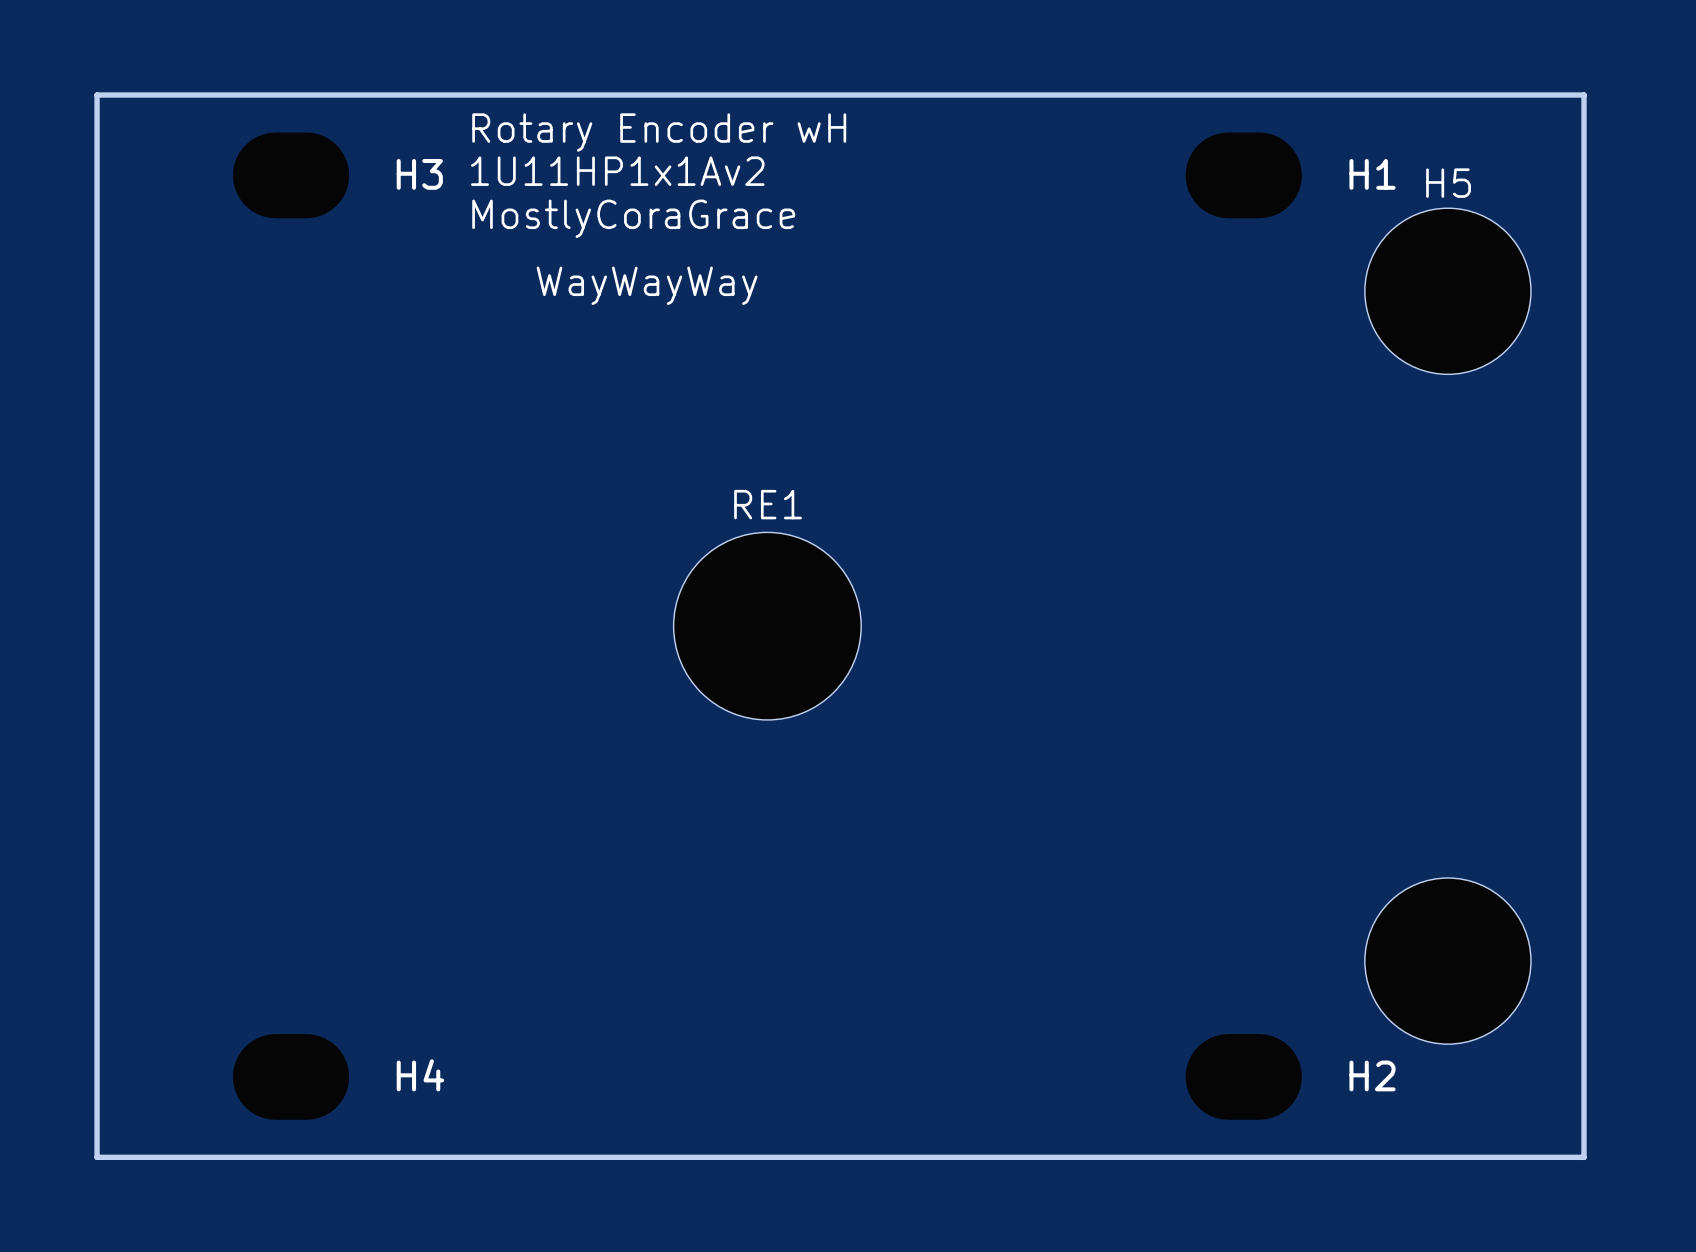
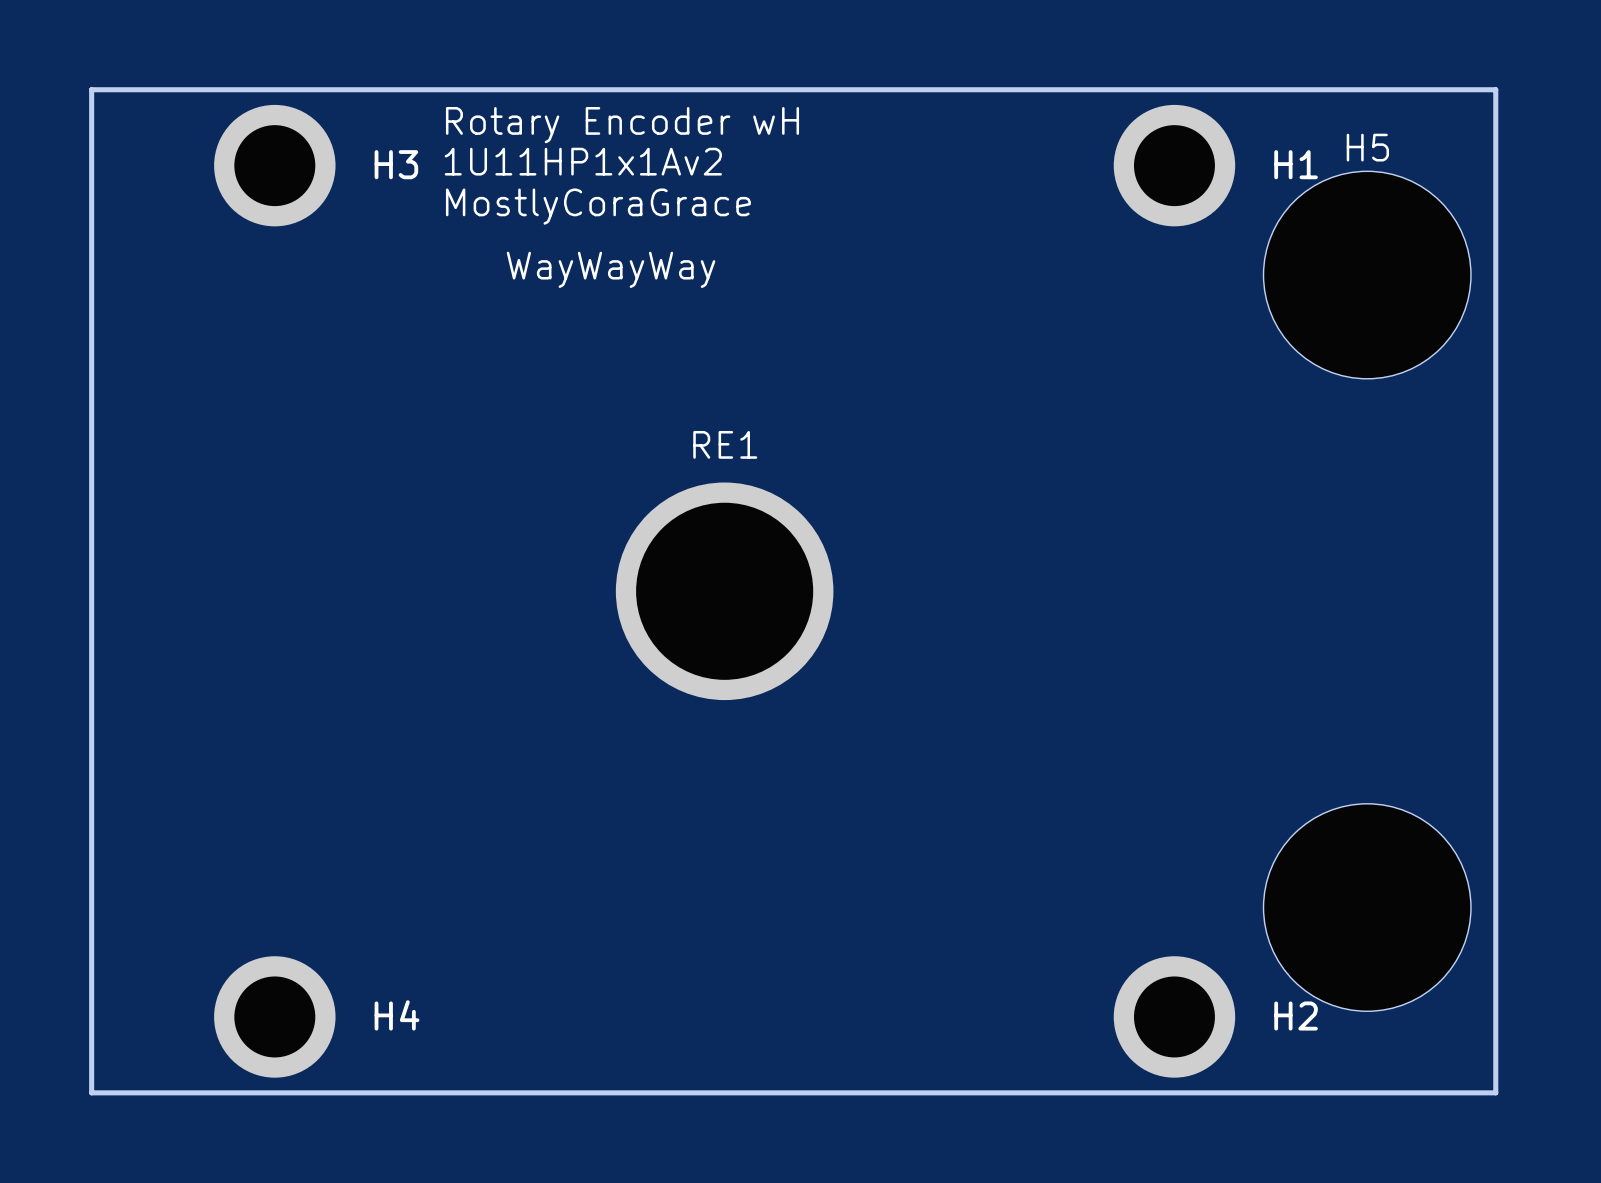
H3 footprint: [232, 132, 350, 219] -> [214, 104, 336, 227]
H1 footprint: [1185, 132, 1302, 219] -> [1113, 104, 1236, 227]
H5 footprint: [1364, 208, 1531, 1045] -> [1263, 171, 1471, 1012]
RE1 footprint: [673, 532, 862, 720] -> [615, 482, 834, 701]
H4 footprint: [232, 1034, 350, 1120] -> [214, 956, 336, 1078]
H2 footprint: [1185, 1034, 1302, 1120] -> [1113, 956, 1236, 1078]

